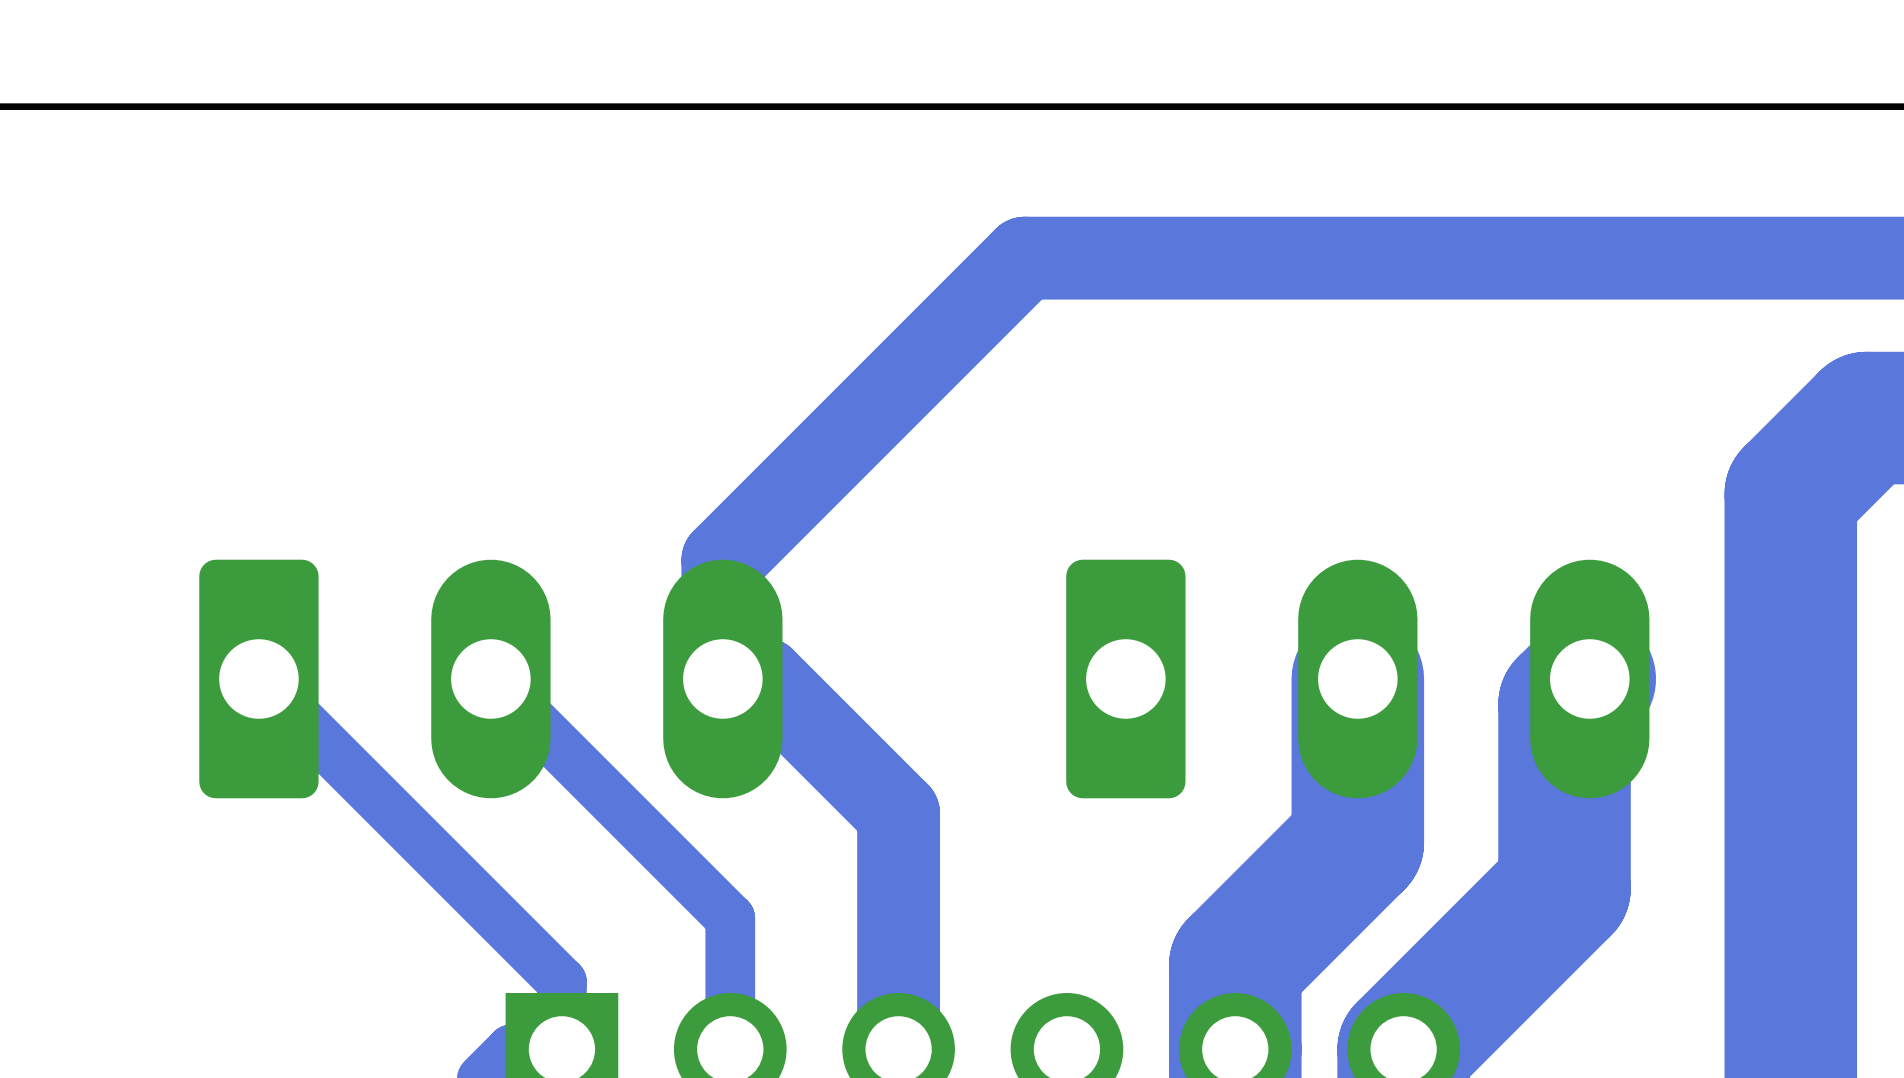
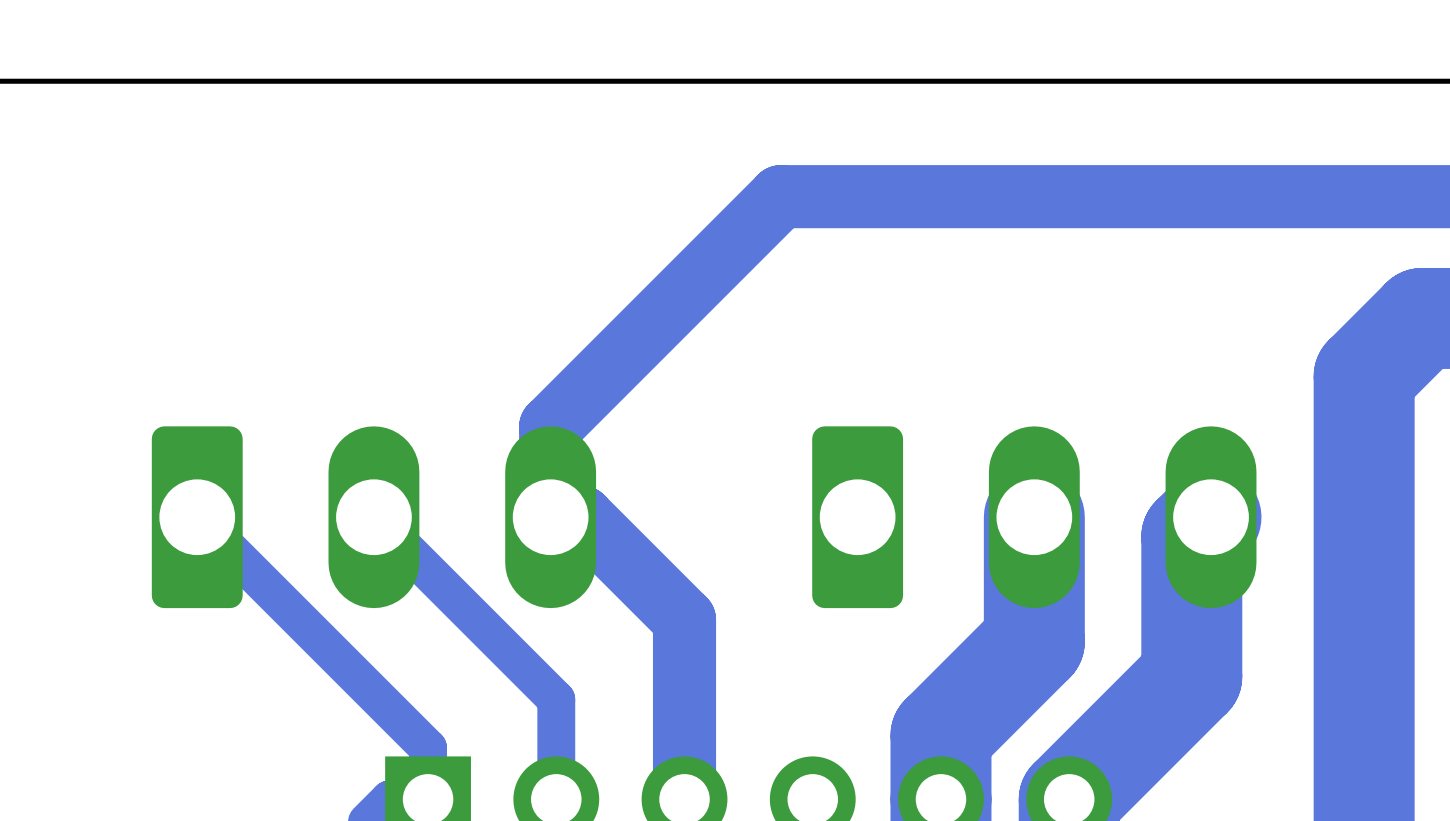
part footprint: [199, 559, 783, 799] -> [151, 426, 597, 609]
part footprint: [1066, 559, 1650, 799] -> [812, 426, 1257, 609]

